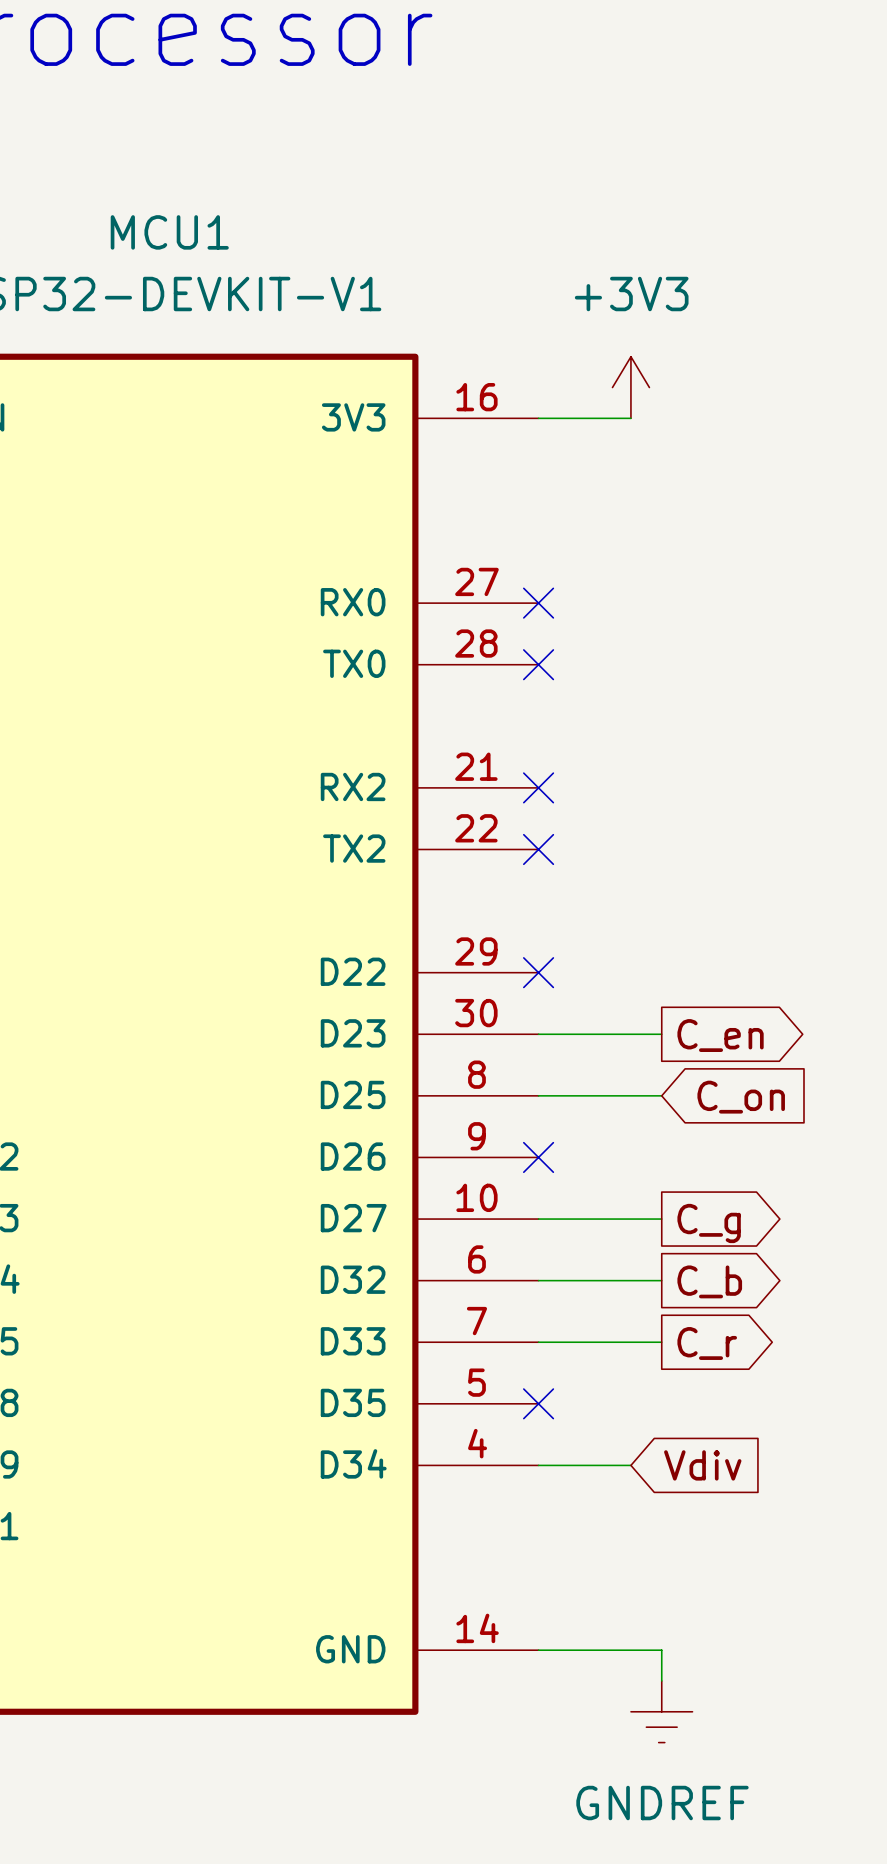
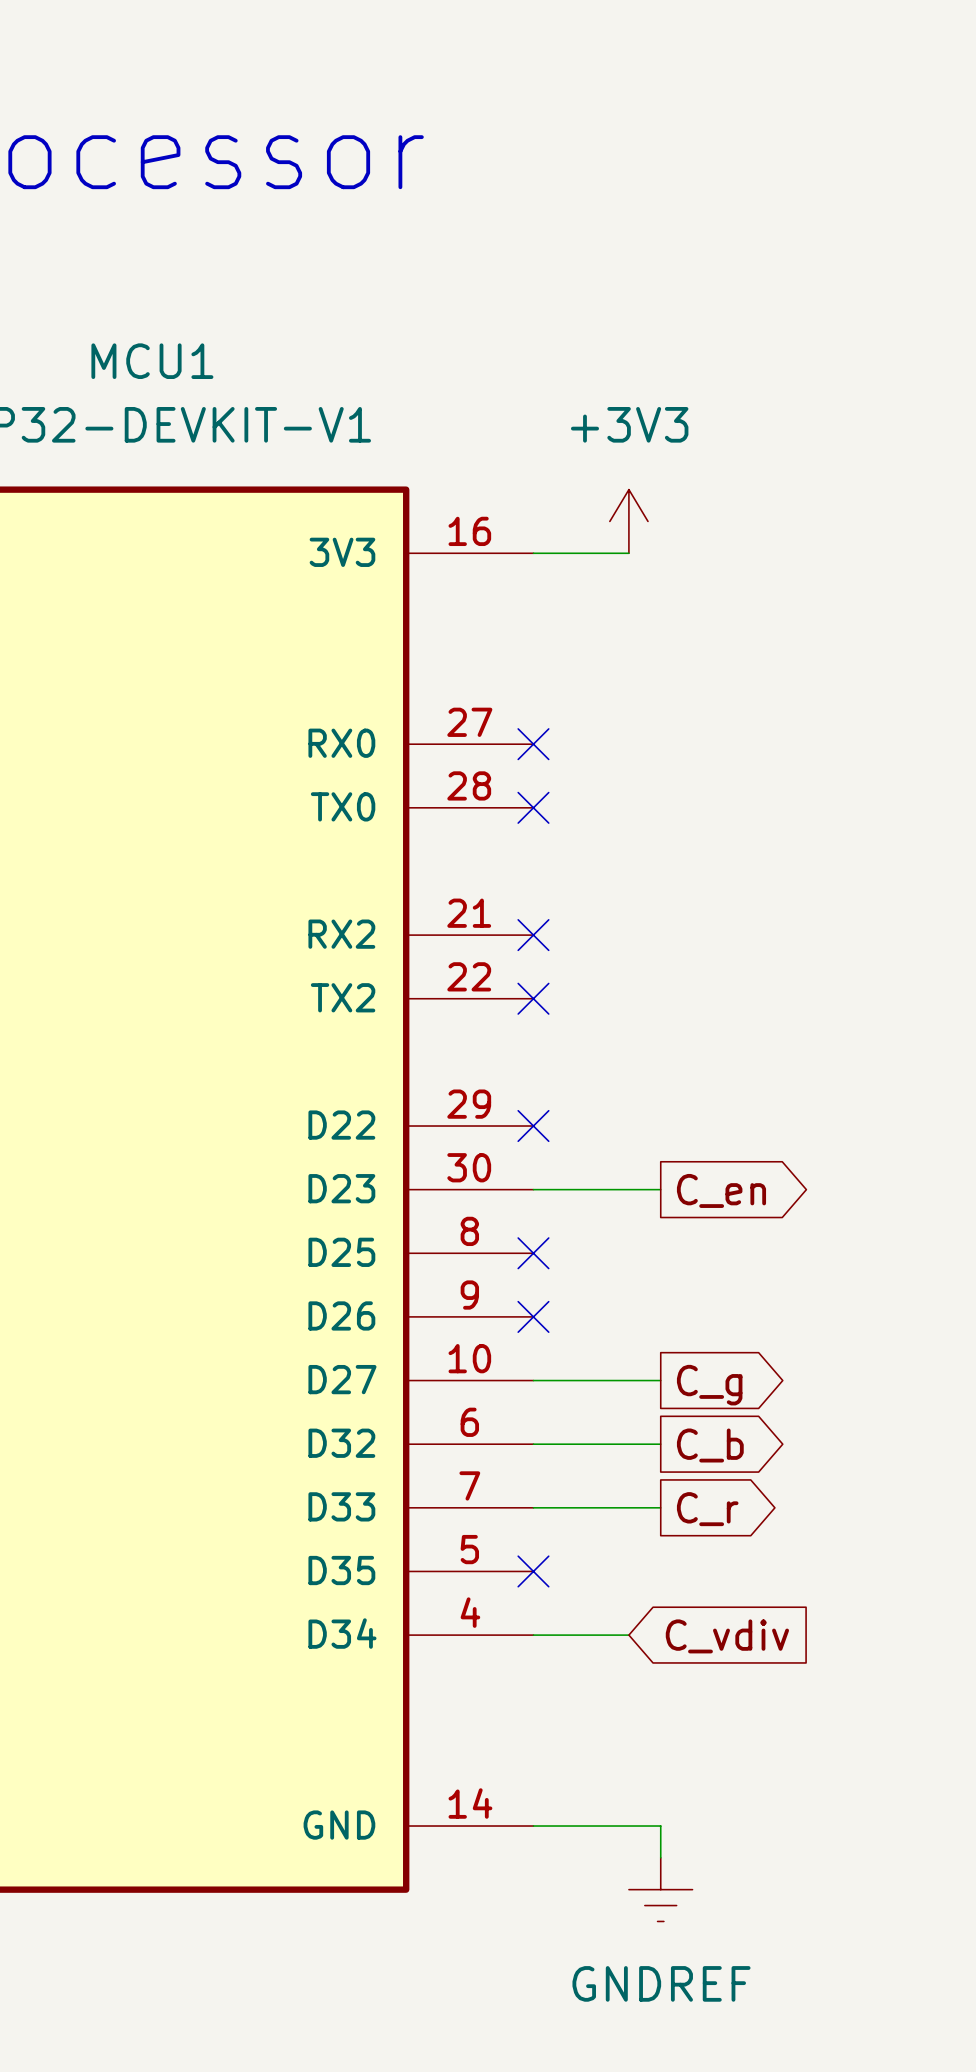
wire: (538, 1095) (661, 1095) -> none
no-connect mark: none -> (533, 1253)
global label: C_on (741, 1097) -> none
global label: Vdiv (702, 1465) -> C_vdiv (727, 1636)

